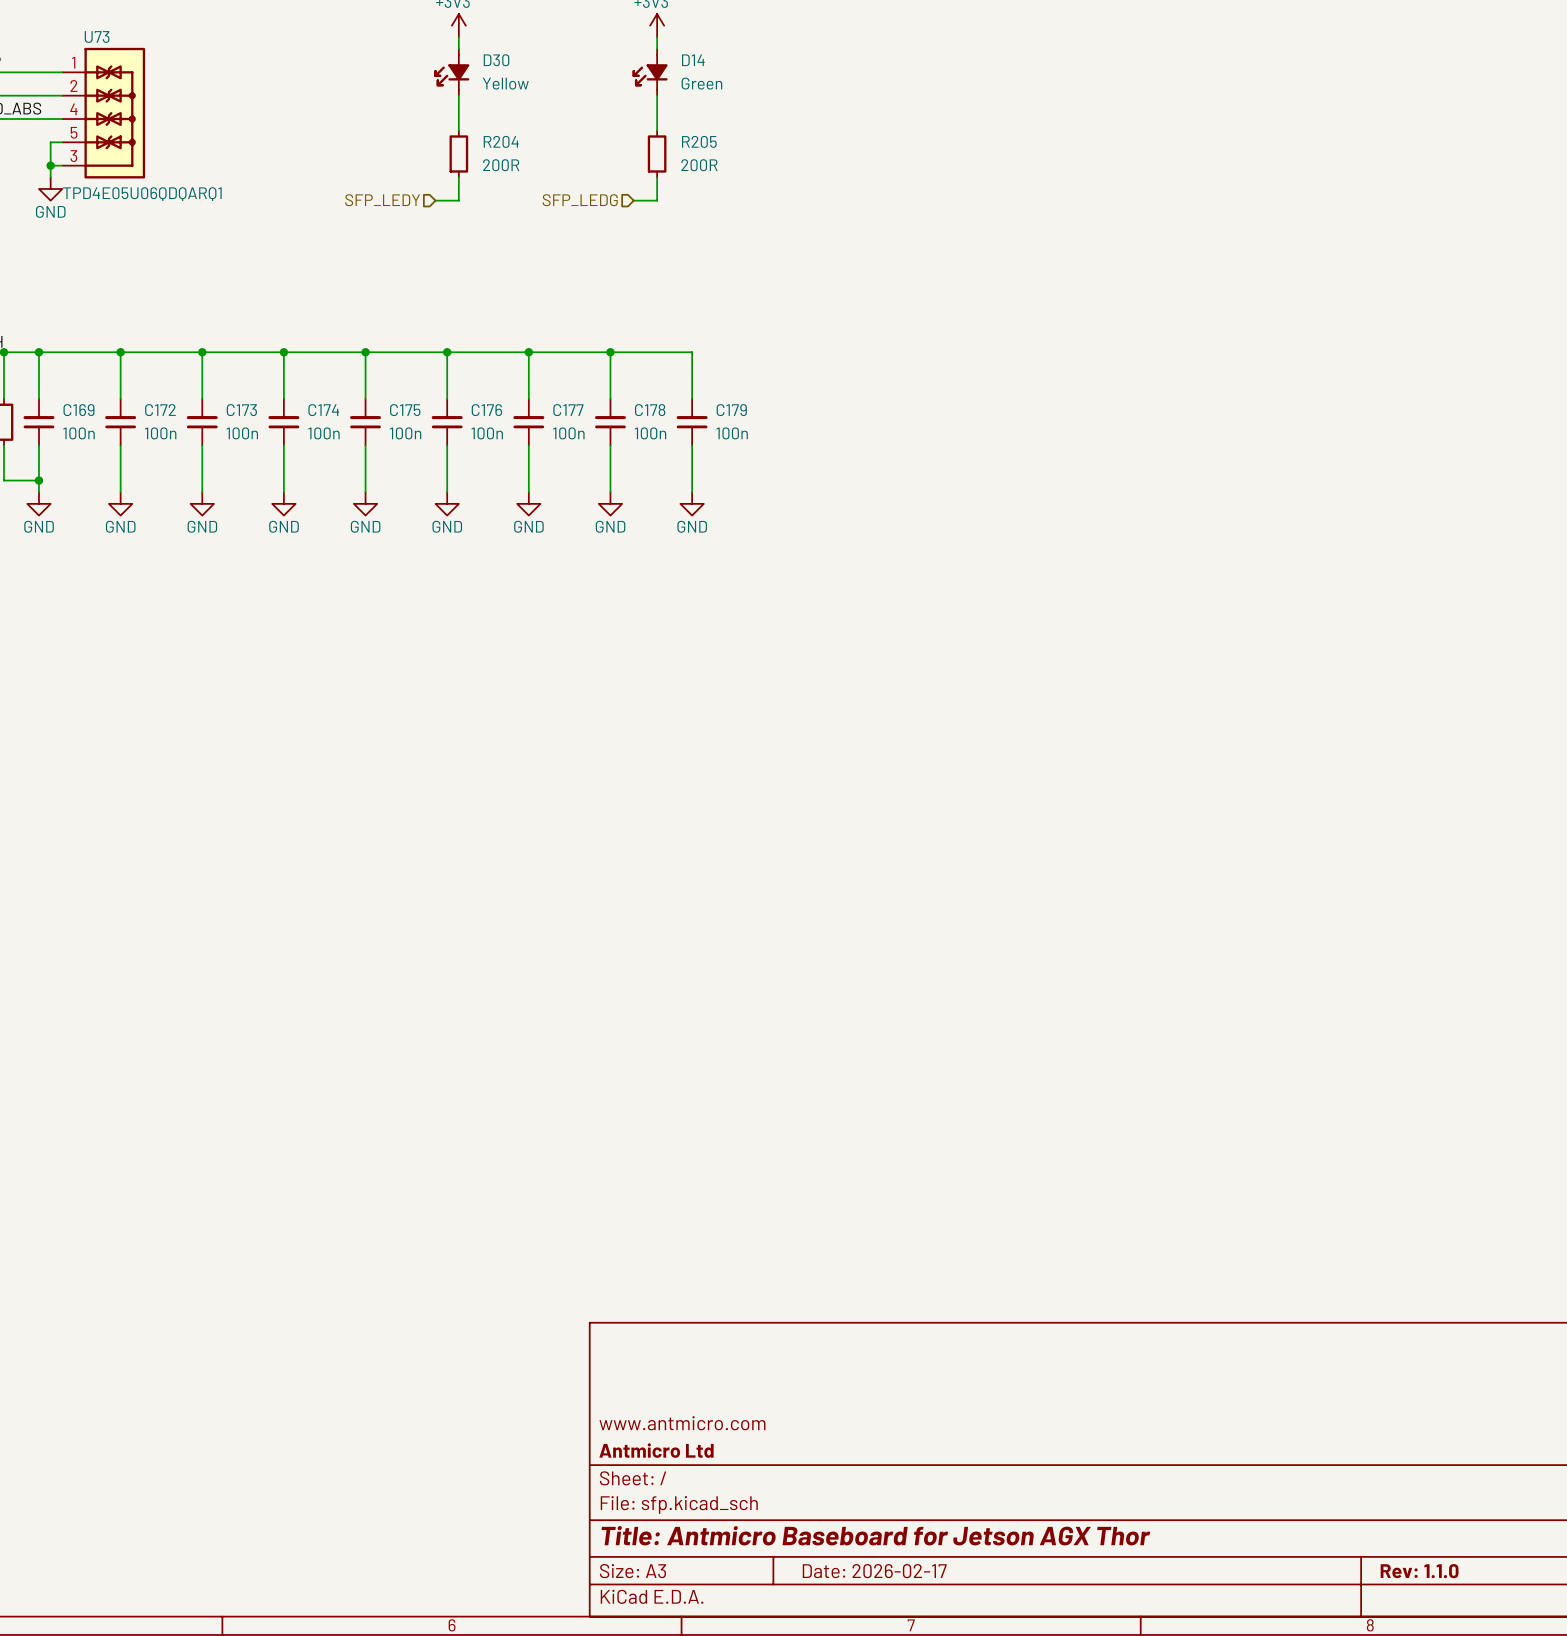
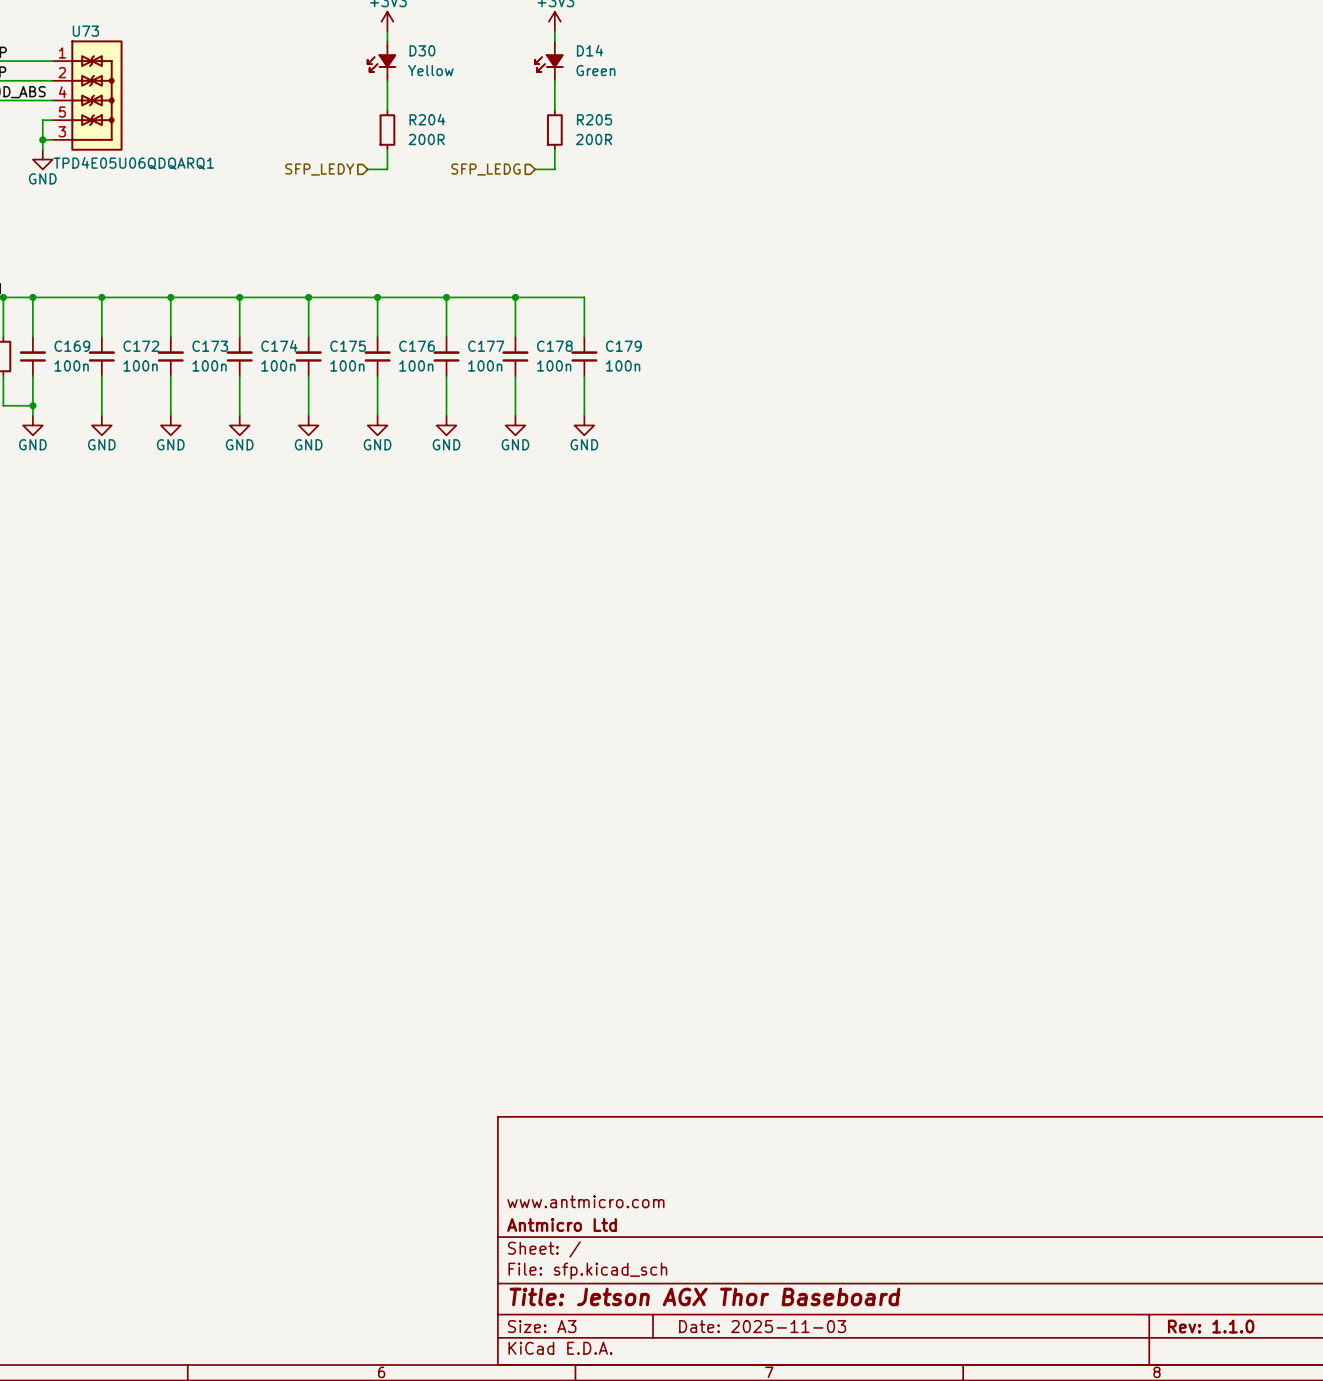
title block: Title: Antmicro Baseboard for Jetson AGX Thor (875, 1535) -> Title: Jetson AGX Thor Baseboard (704, 1296)
title block: Date: 2026-02-17 (874, 1571) -> Date: 2025-11-03 (762, 1326)

